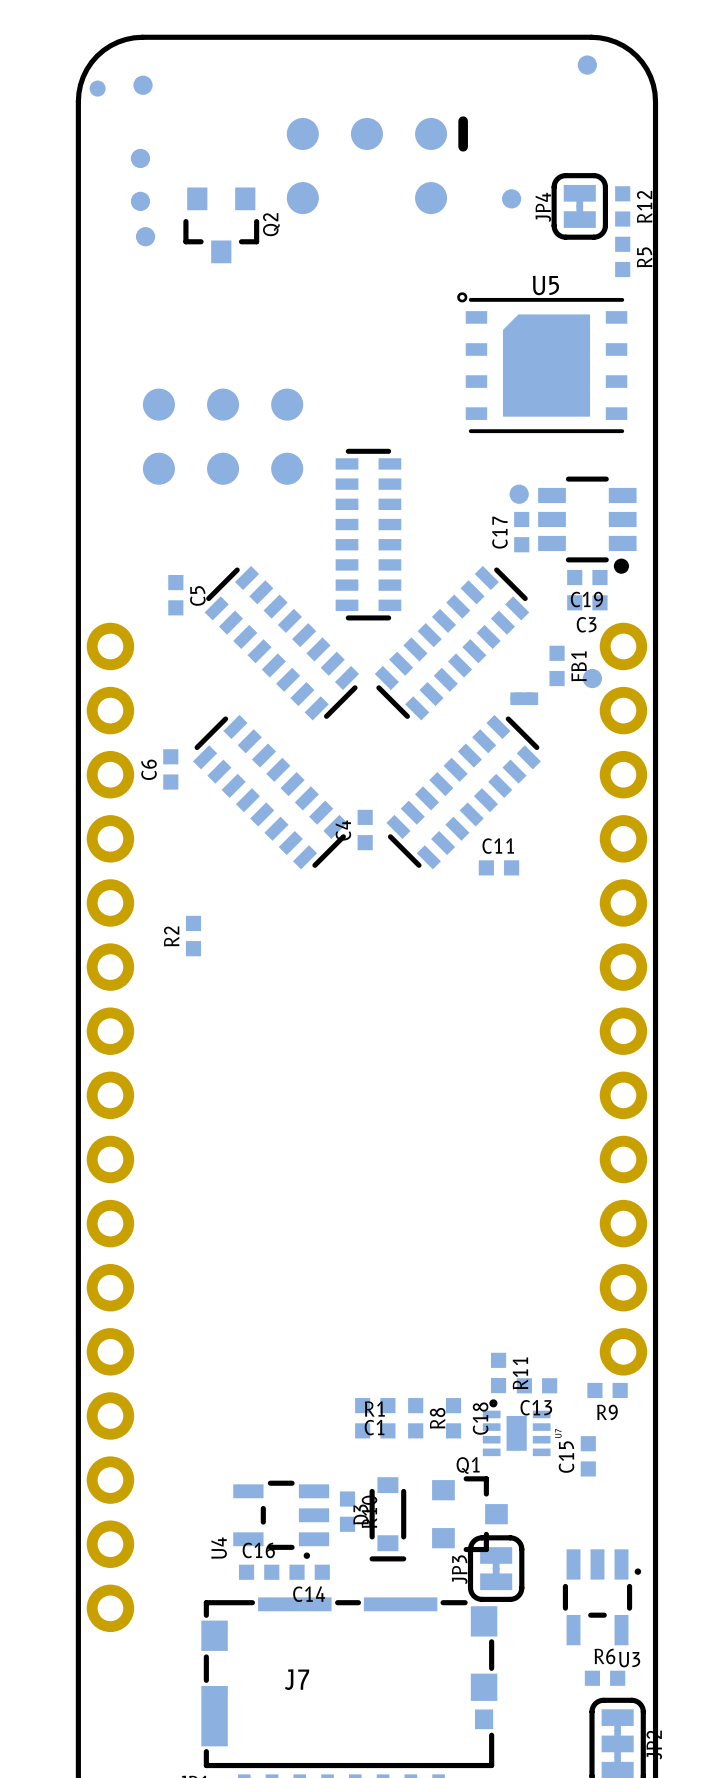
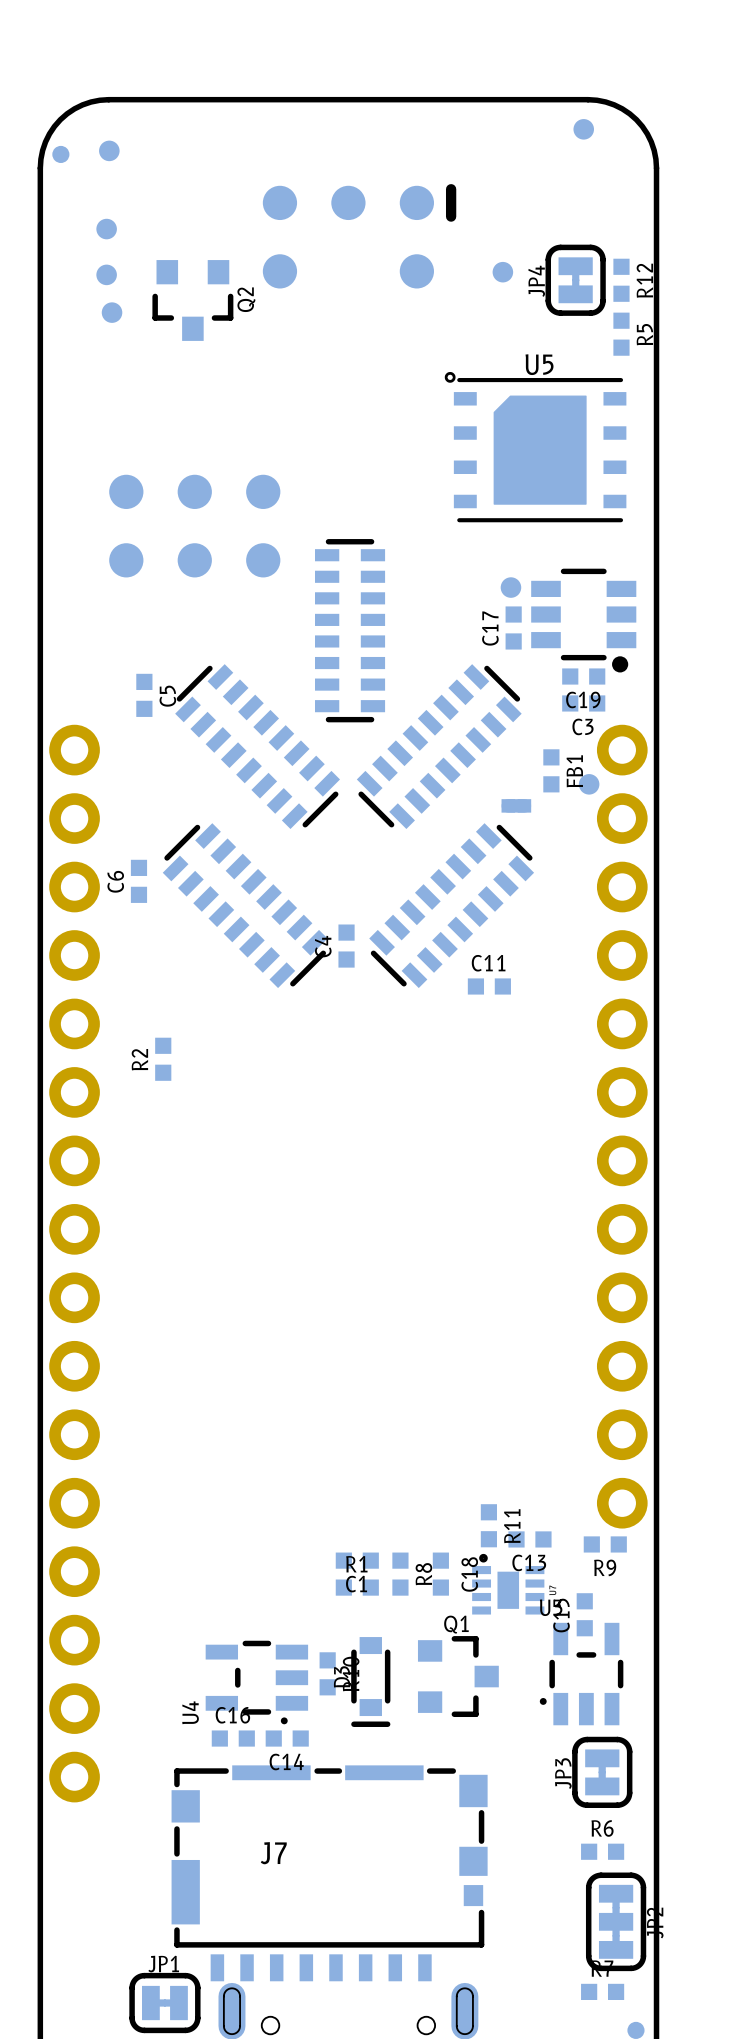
JP3 position: (496, 1568) -> (602, 1772)
U3 rotation: 0° (601, 1597) -> 180° (581, 1674)
U3 position: (601, 1597) -> (581, 1674)

